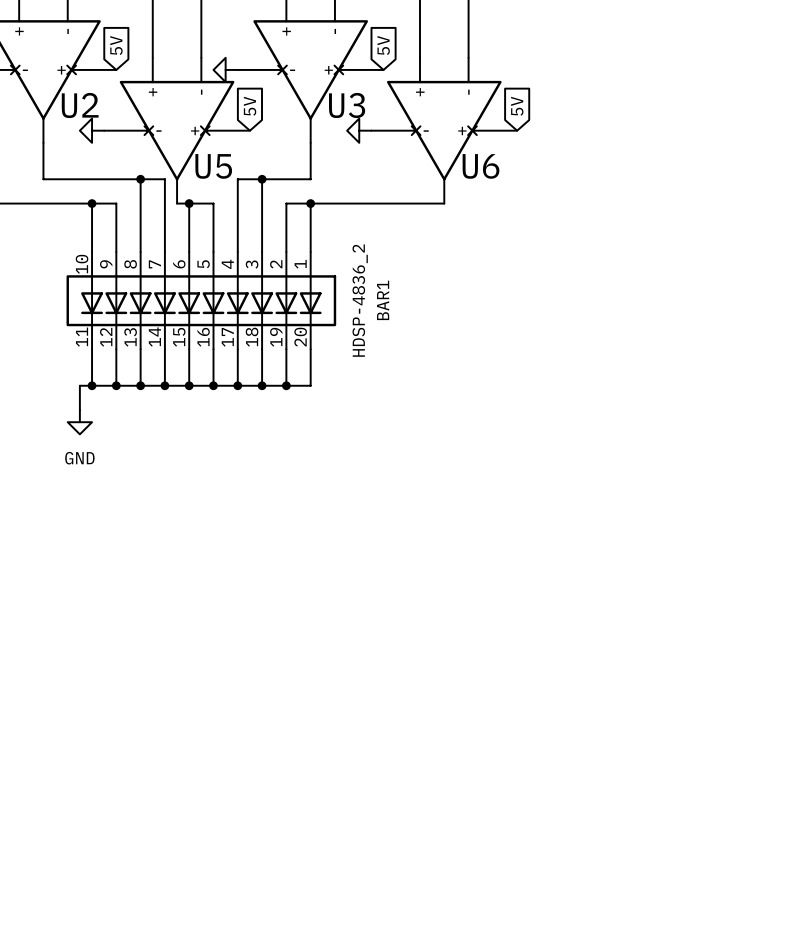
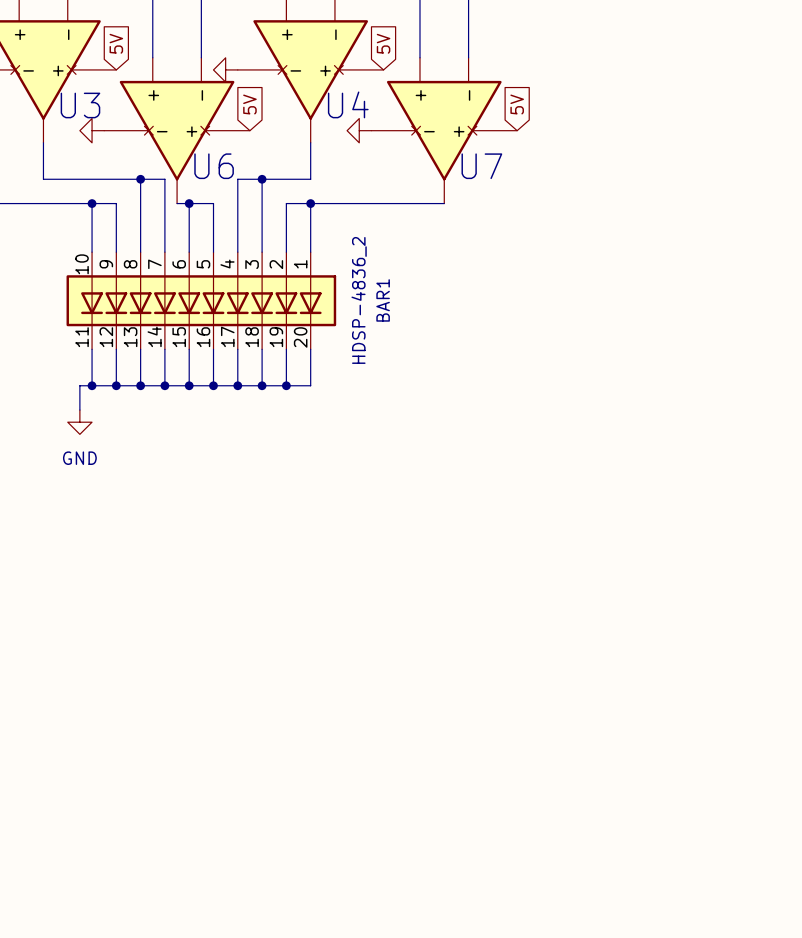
U2 name: U2 (80, 105) -> U3 (80, 105)
U3 name: U3 (347, 105) -> U4 (348, 104)
U5 name: U5 (213, 166) -> U6 (214, 166)
U6 name: U6 (481, 166) -> U7 (481, 166)

